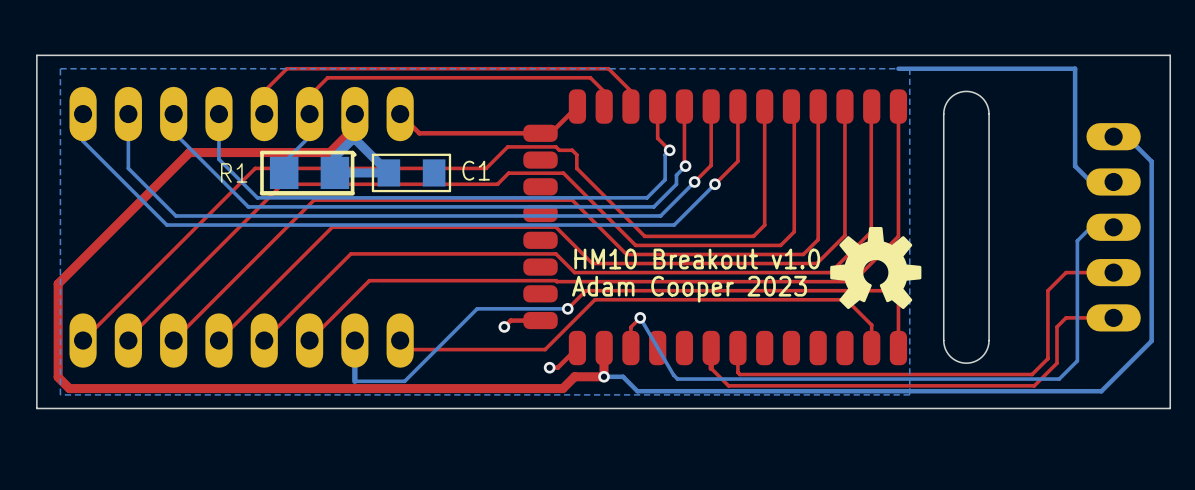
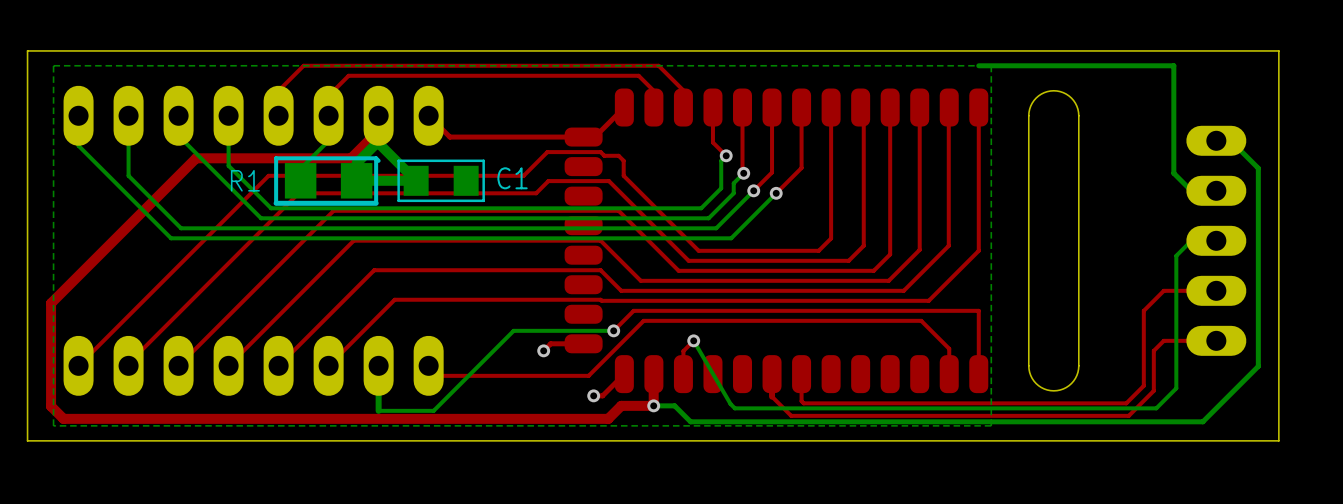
drawing: [830, 227, 922, 310] -> none
text: HM10 Breakout v1.0 (697, 259) -> none
text: Adam Cooper 2023 (689, 289) -> none

